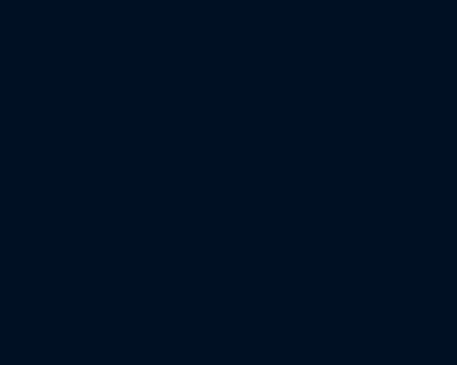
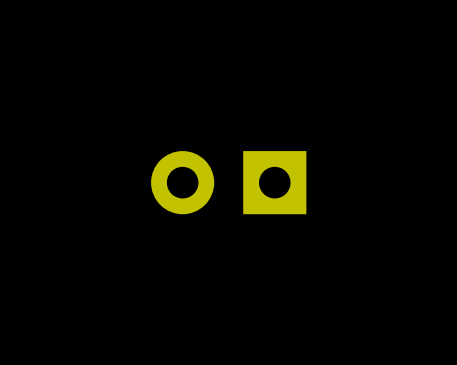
part: none -> (228, 182)

